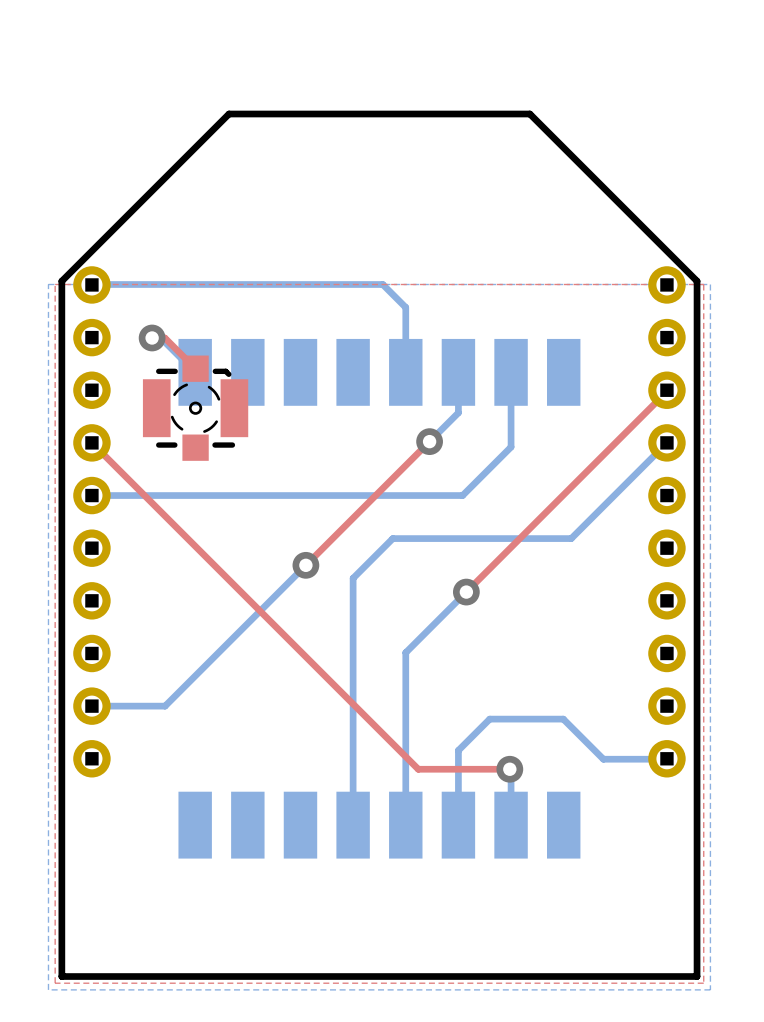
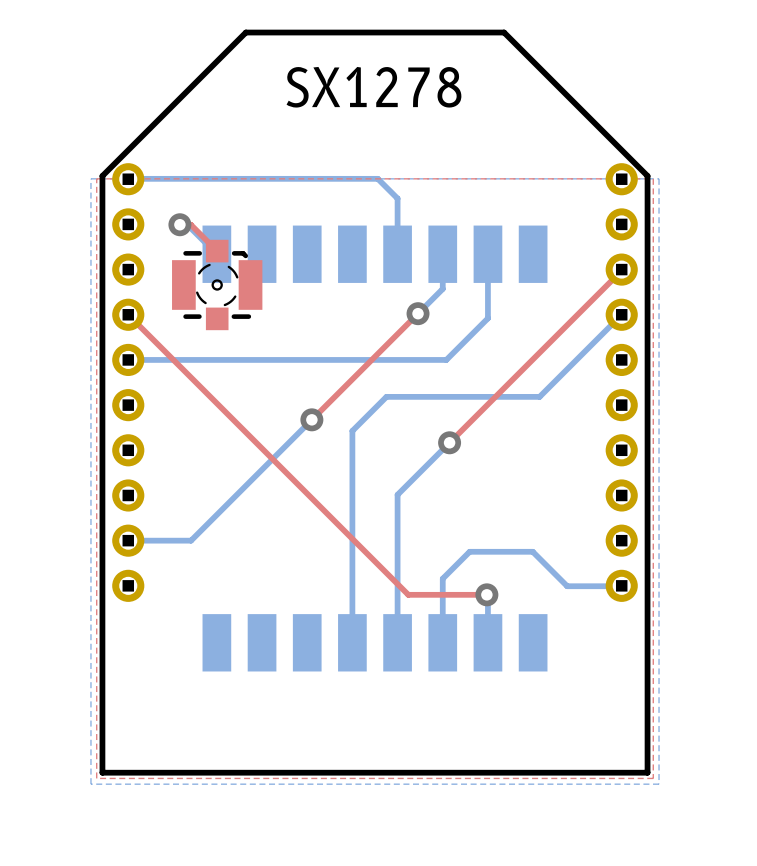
text: none -> SX1278 (373, 87)

